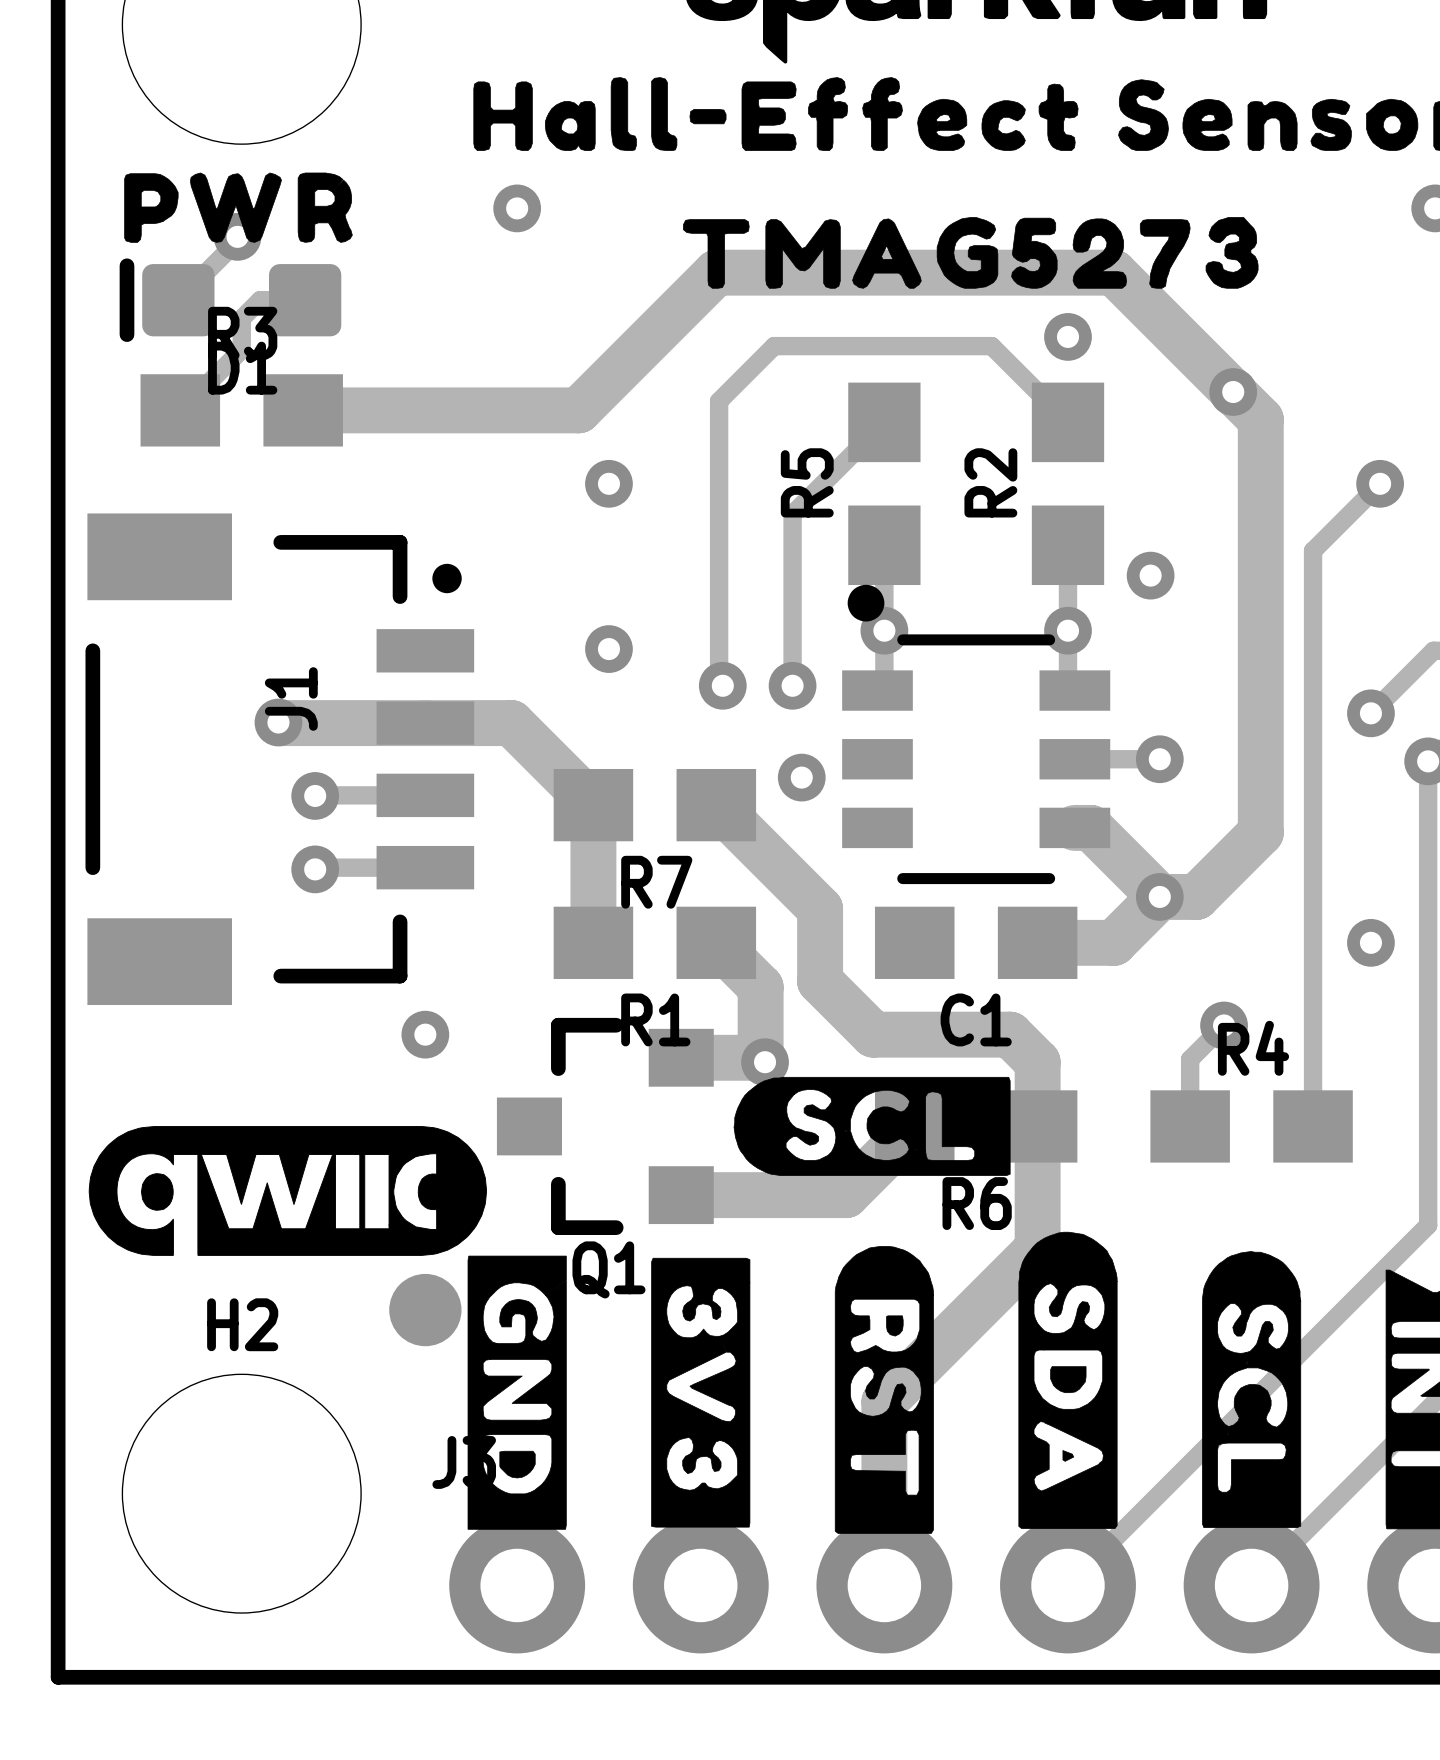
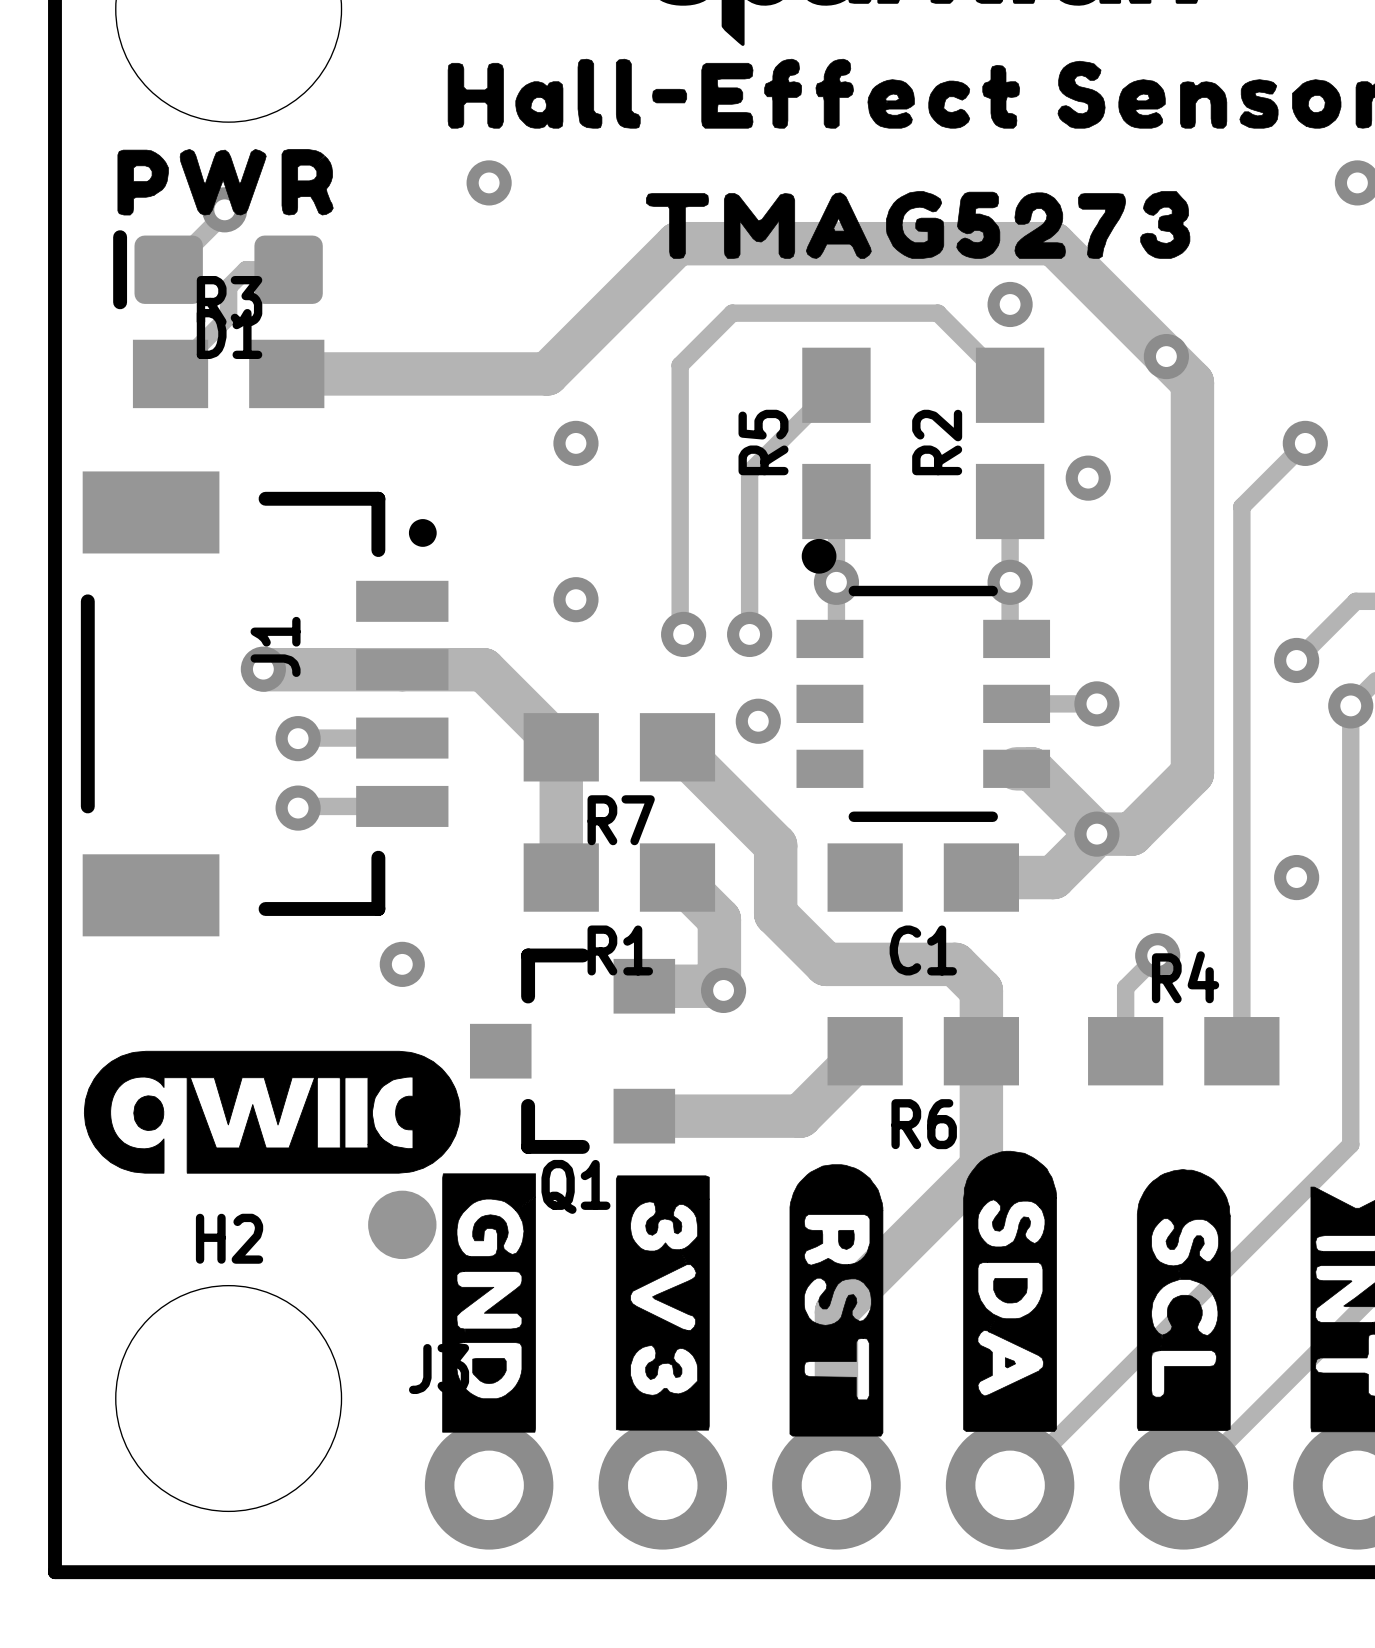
via position: (1150, 575) -> (1088, 478)
drawing: [733, 1076, 1011, 1176] -> none

